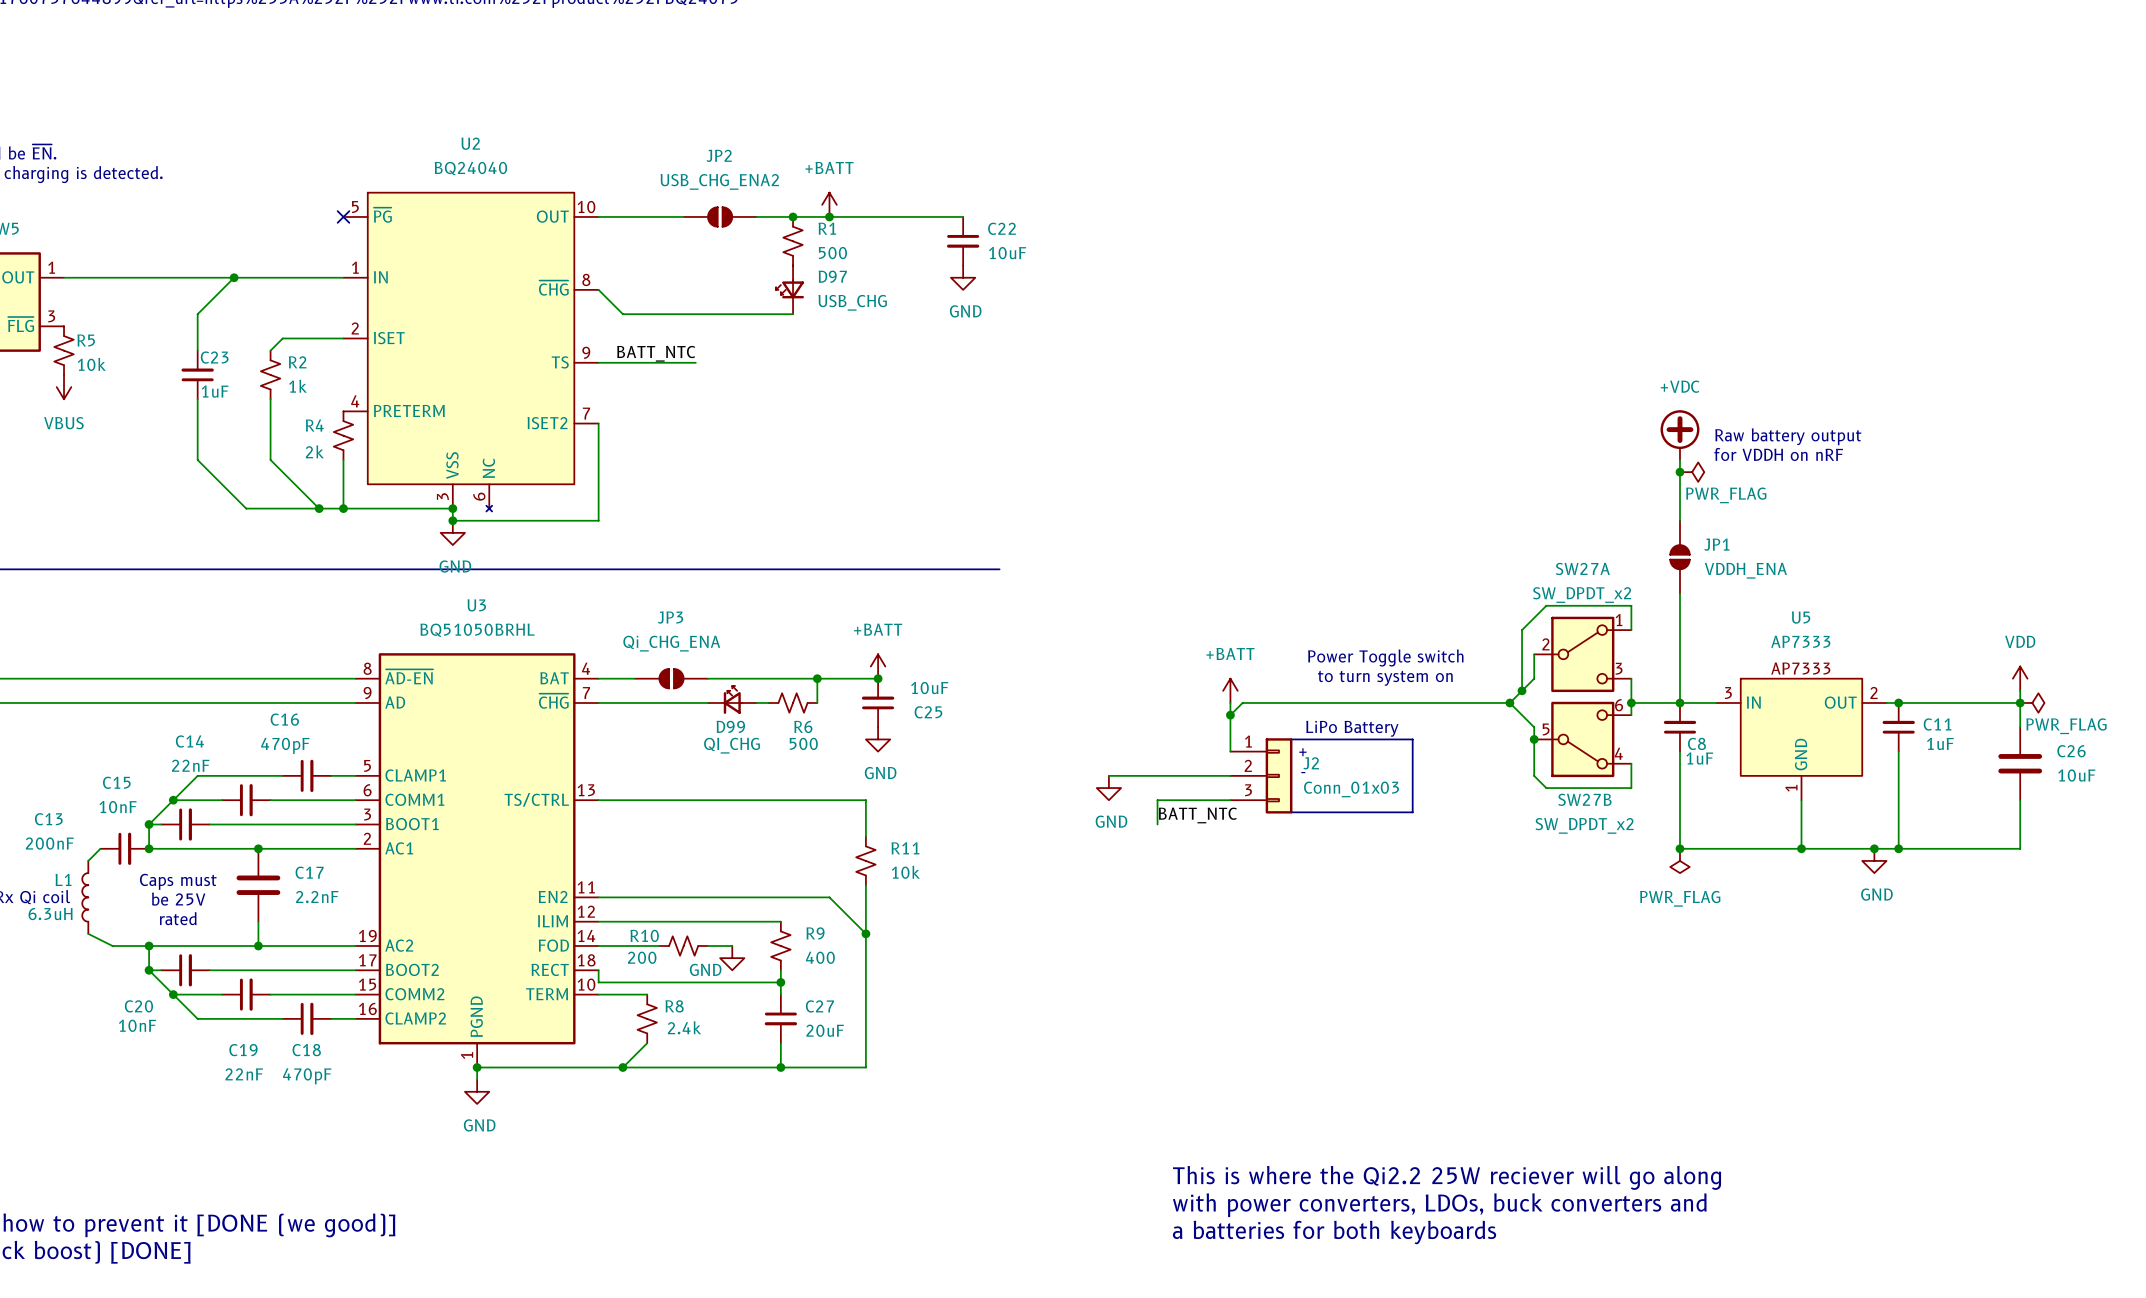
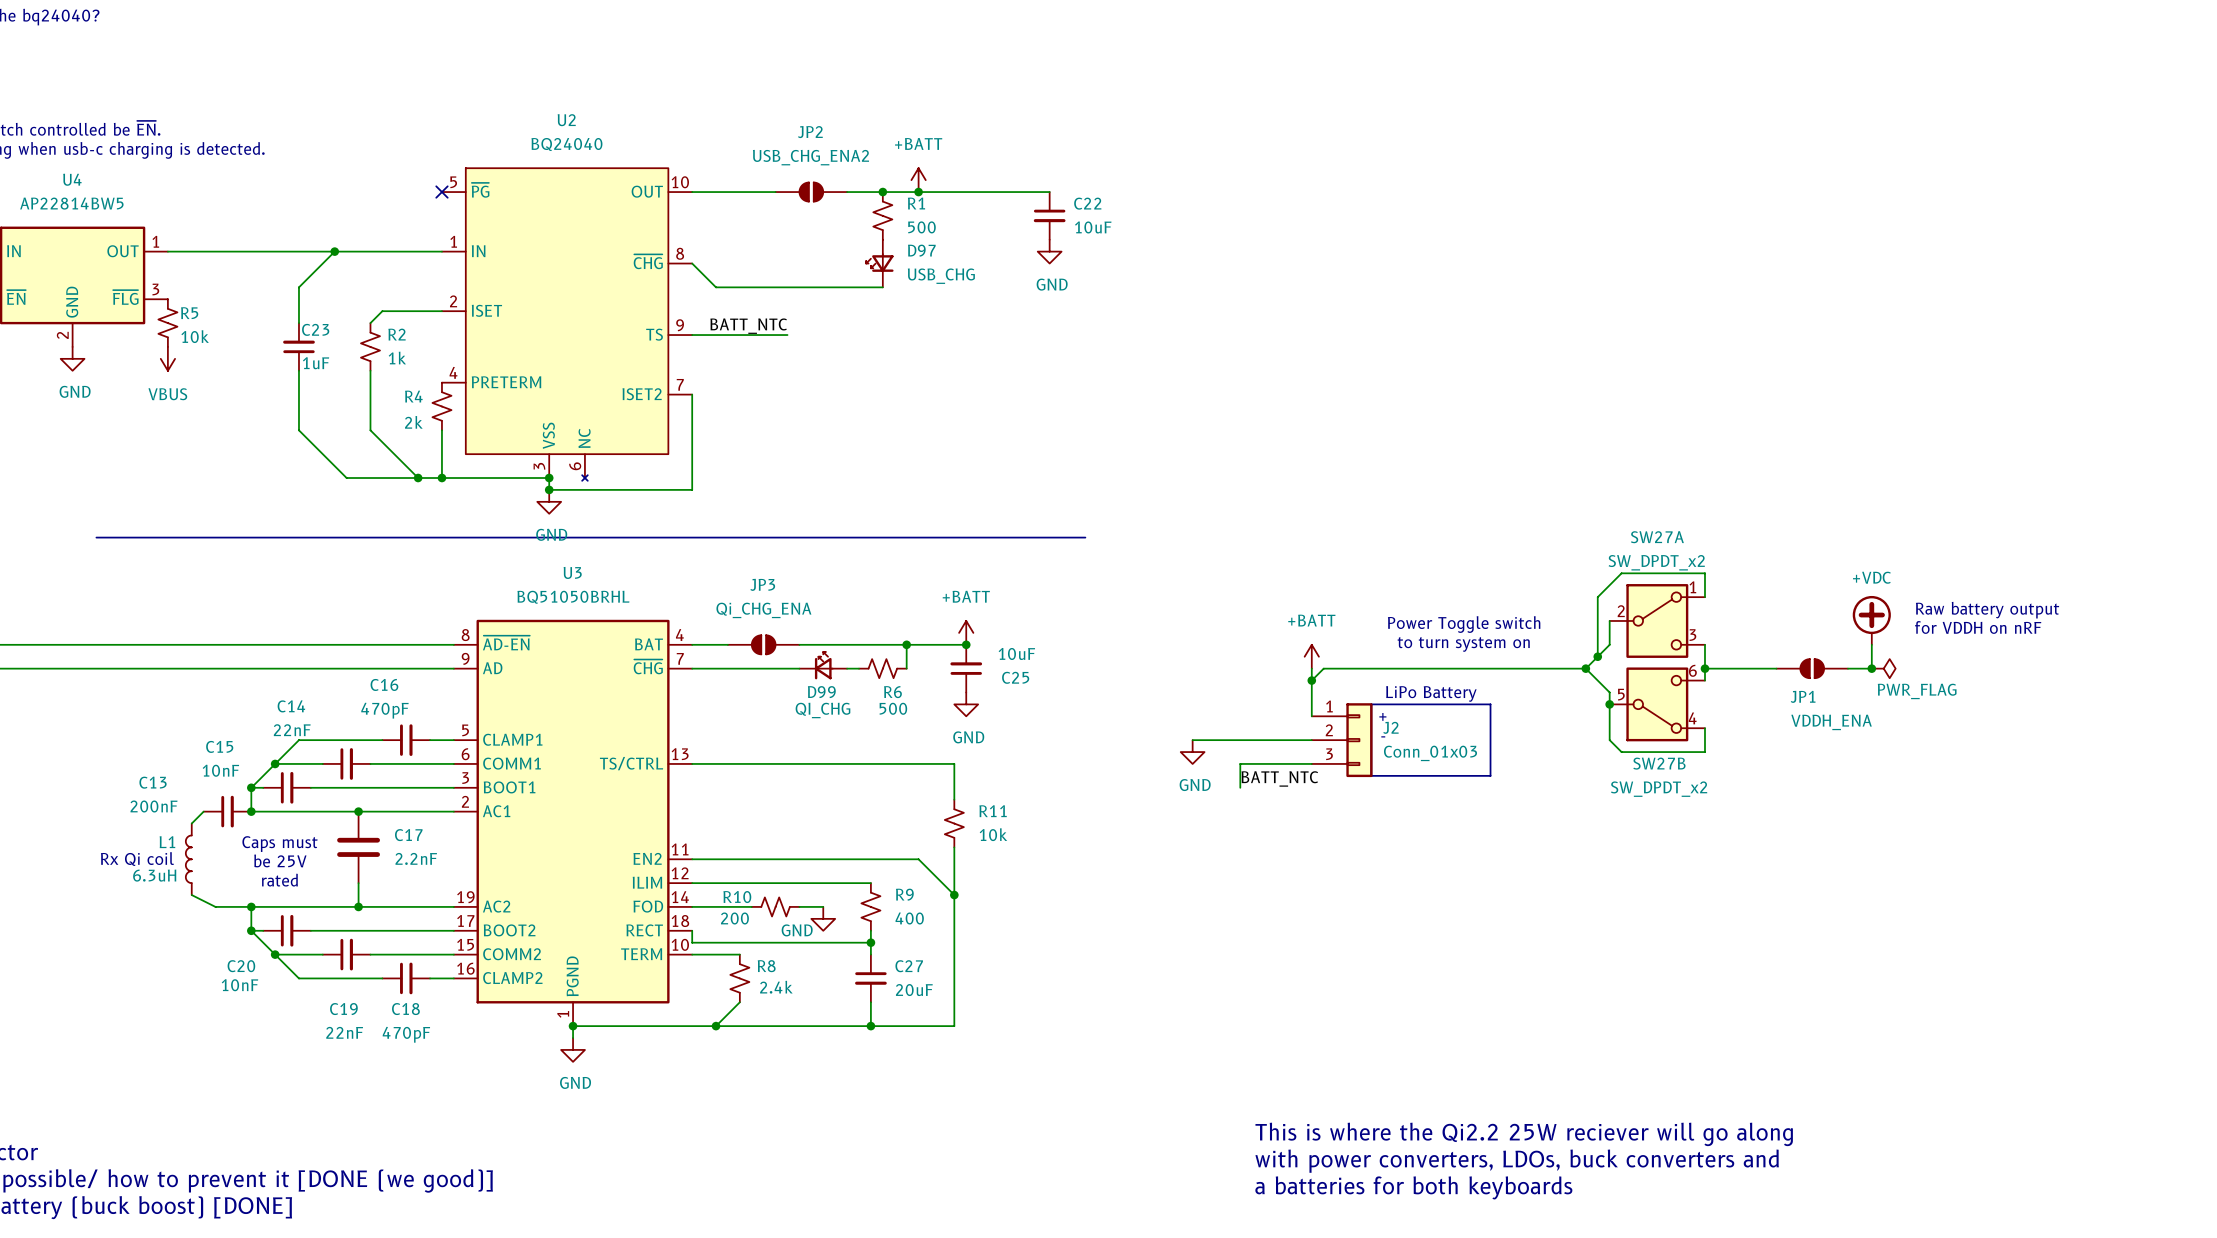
power symbol: +VDC (1679, 435) -> none
text: Raw battery output (1788, 436) -> none
text: for VDDH on nRF (1778, 454) -> none
wire: (1679, 459) (1679, 520) -> none
junction: (1679, 472) -> none
power symbol: PWR_FLAG (1692, 472) -> none
JP1 name position: JP1 (1716, 544) -> JP1 (1803, 696)
JP1 rotation: 0° (1679, 557) -> 90° clockwise (1812, 668)
JP1 position: (1679, 557) -> (1812, 668)
JP1 value position: VDDH_ENA (1745, 570) -> VDDH_ENA (1831, 722)
wire: (1679, 593) (1679, 702) -> none
text: none -> Raw battery output (1987, 610)
power symbol: none -> +VDC (1871, 620)
text: none -> for VDDH on nRF (1978, 627)
power symbol: VDD (2020, 678) -> none
wire: (2020, 690) (2020, 727) -> none
junction: (1679, 702) -> none
junction: none -> (1871, 668)
power symbol: none -> PWR_FLAG (1883, 668)
wire: (1886, 702) (2020, 702) -> none
junction: (1898, 702) -> none
junction: (2020, 702) -> none
power symbol: PWR_FLAG (2032, 702) -> none
C8: 1uF (1679, 727) -> none
C11: 1uF (1898, 727) -> none
U5: AP7333 (1801, 739) -> none
wire: (1679, 751) (1679, 848) (2020, 848) (2020, 800) -> none
wire: (1898, 751) (1898, 848) -> none
C26: 10uF (2020, 763) -> none
wire: (1801, 800) (1801, 848) -> none
junction: (1679, 848) -> none
junction: (1801, 848) -> none
junction: (1874, 848) -> none
junction: (1898, 848) -> none
power symbol: PWR_FLAG (1679, 860) -> none
power symbol: GND (1874, 860) -> none

